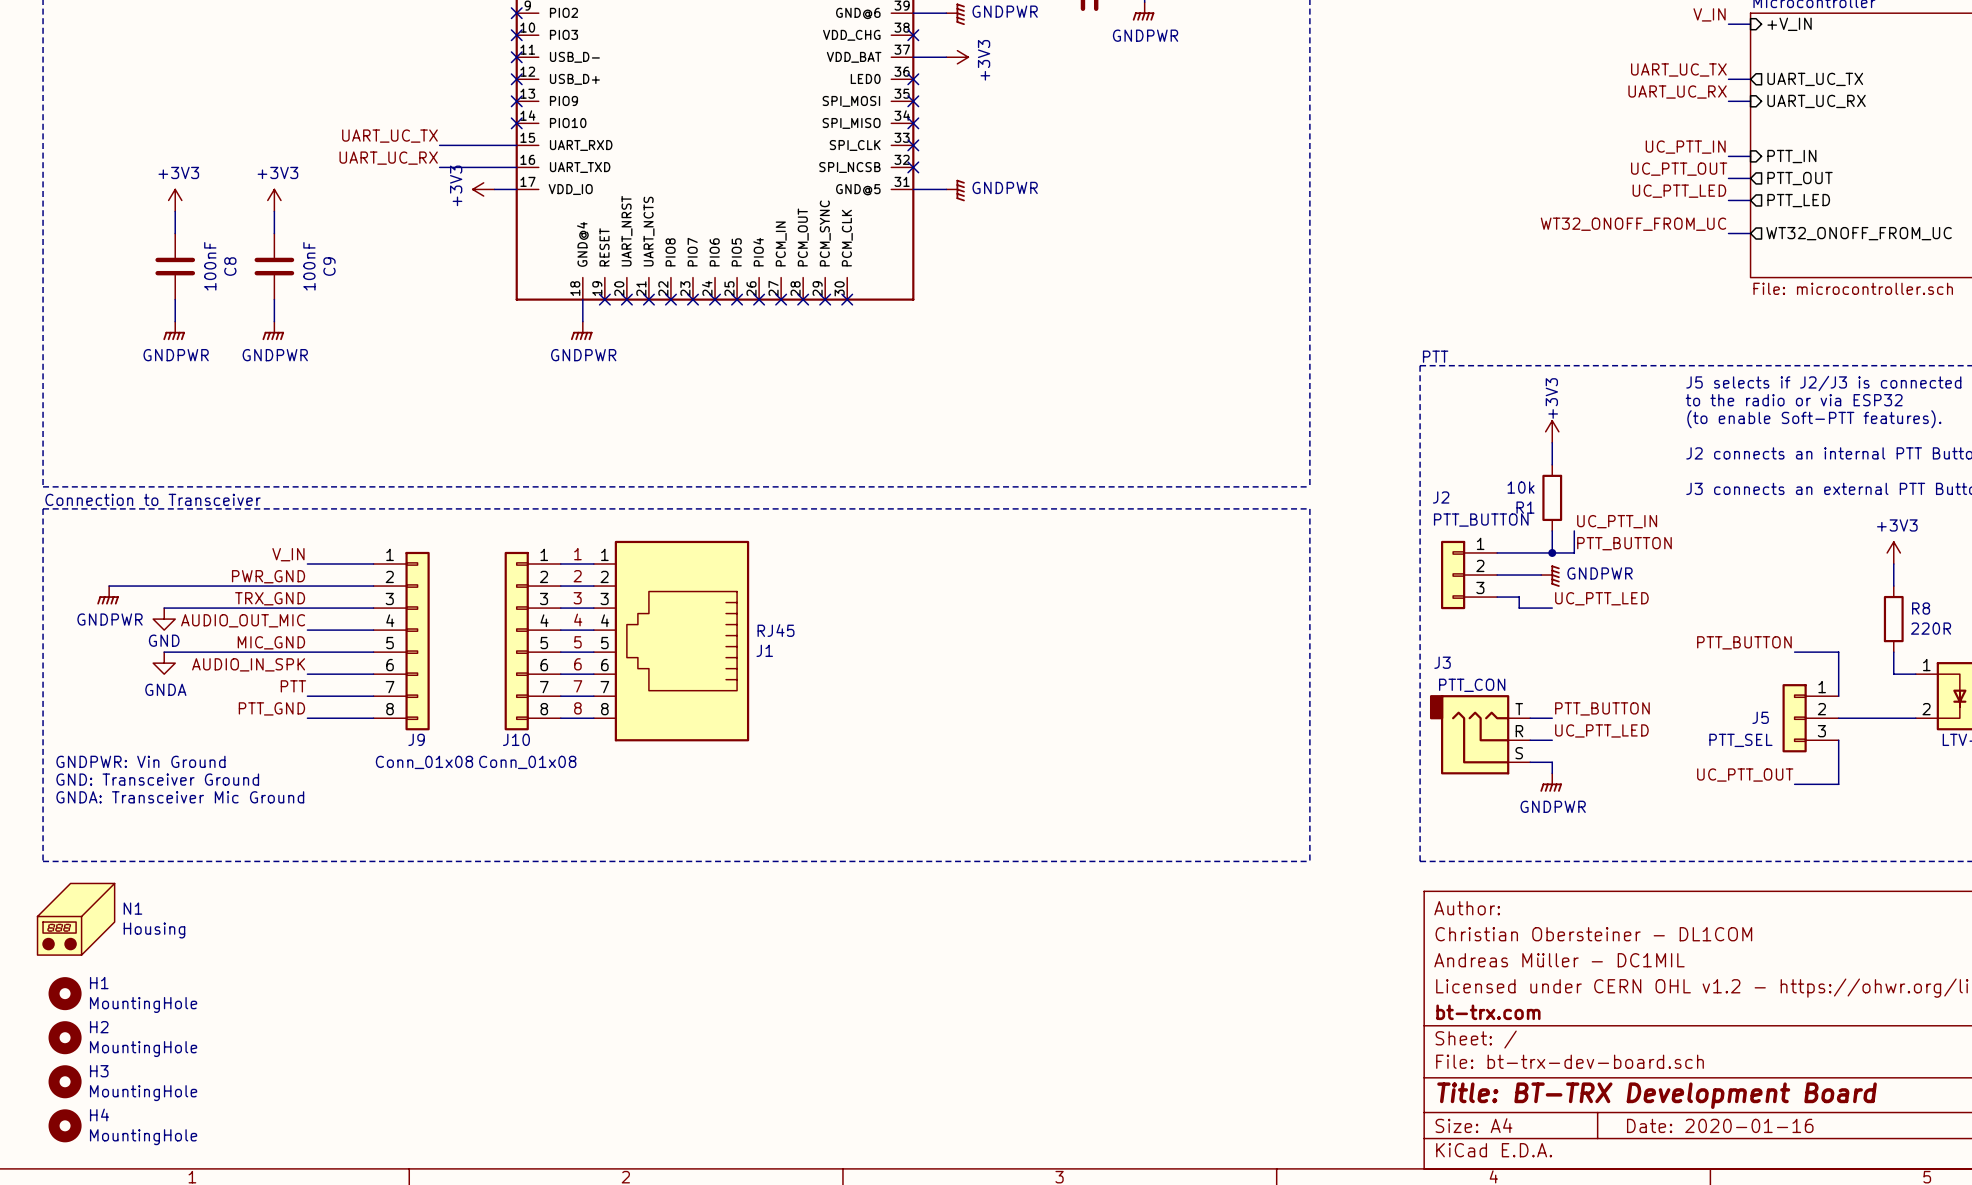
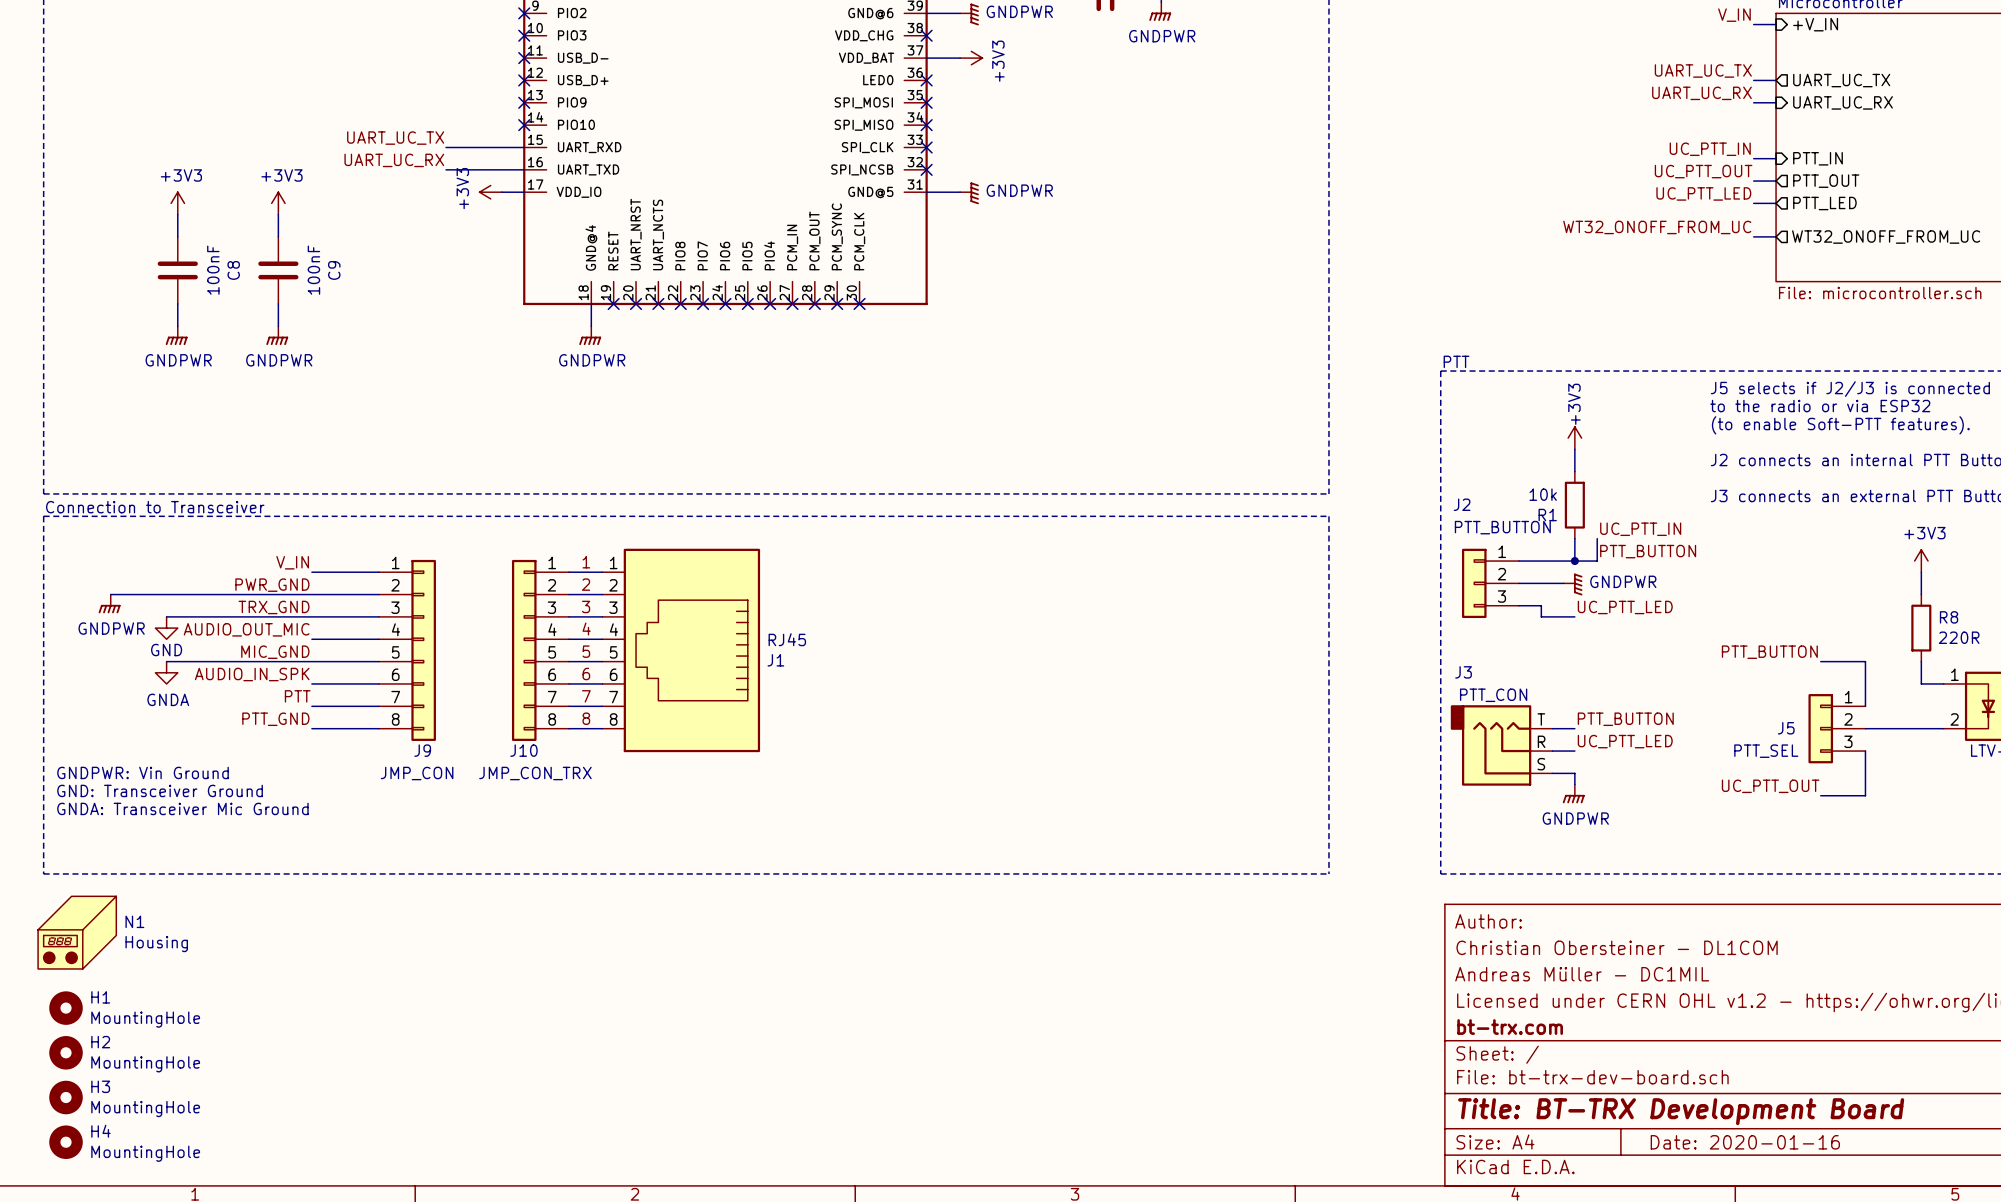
J9 value: Conn_01x08 (424, 762) -> JMP_CON (417, 773)
J10 value: Conn_01x08 (527, 762) -> JMP_CON_TRX (535, 773)

